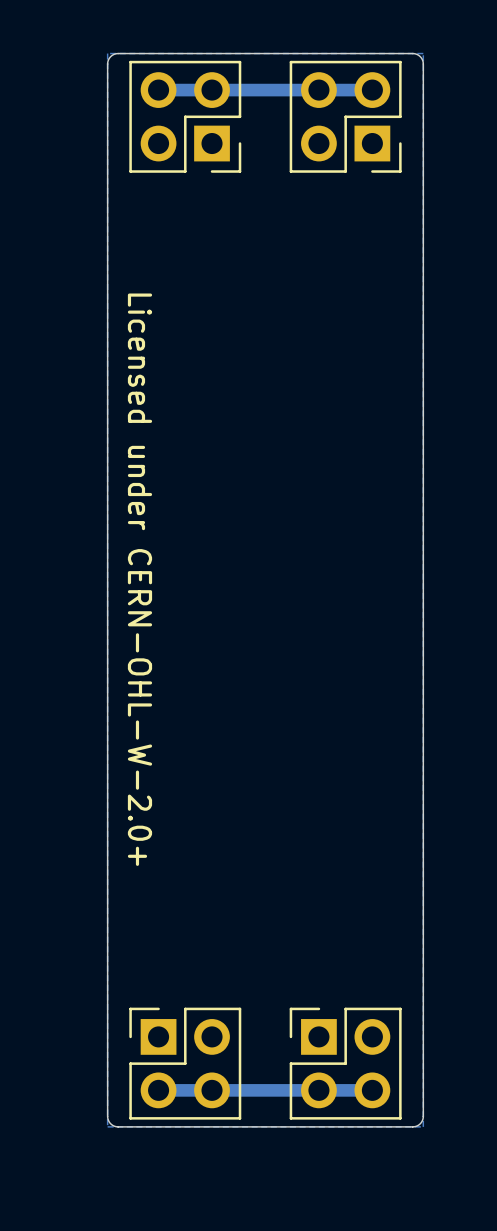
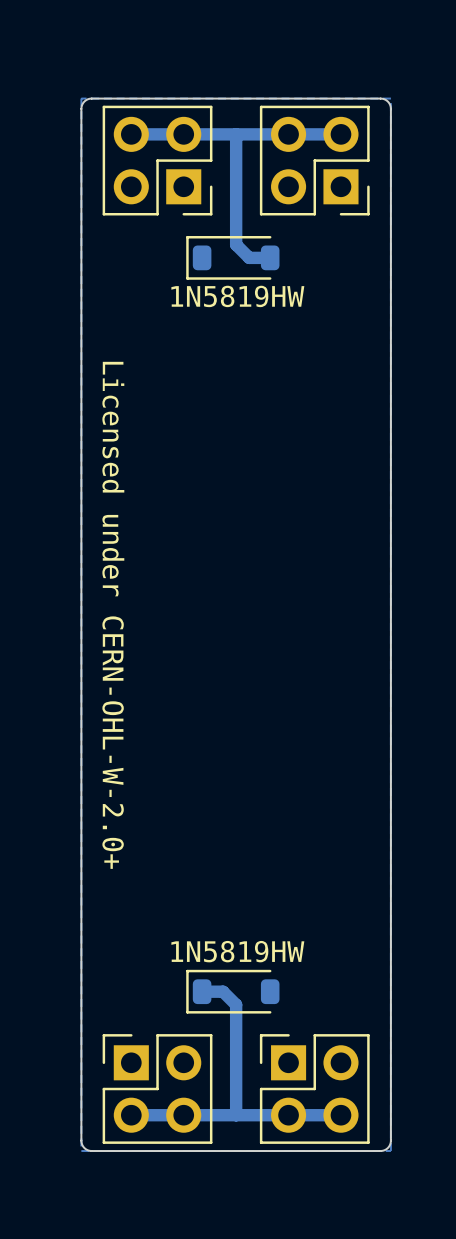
track: none -> (236, 134) (236, 244) (249, 257) (270, 257)
part: none -> 1N5819HW (232, 257)
track: none -> (202, 991) (223, 991) (236, 1004) (236, 1115)
part: none -> 1N5819HW (232, 991)

